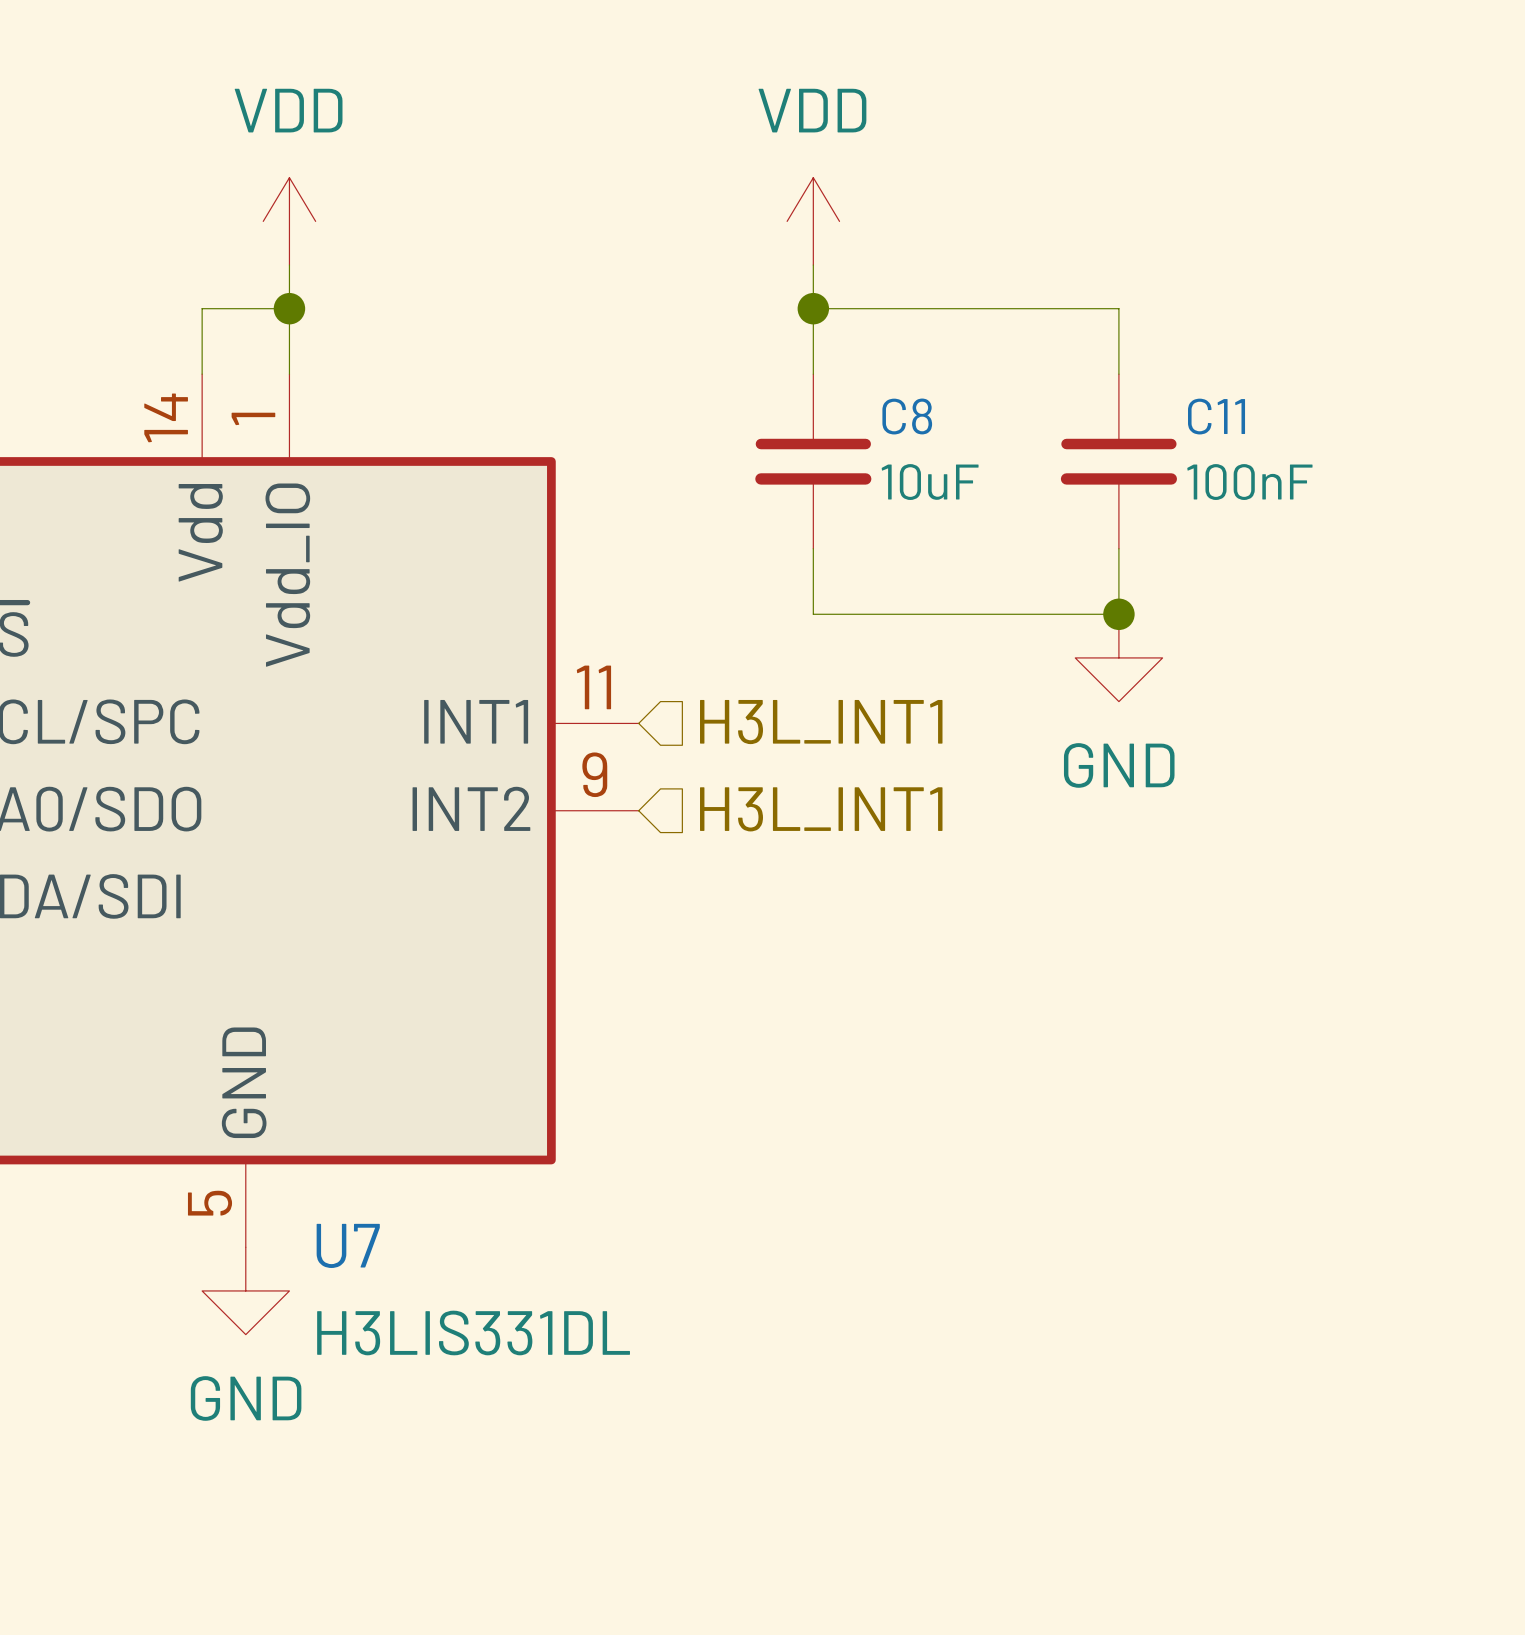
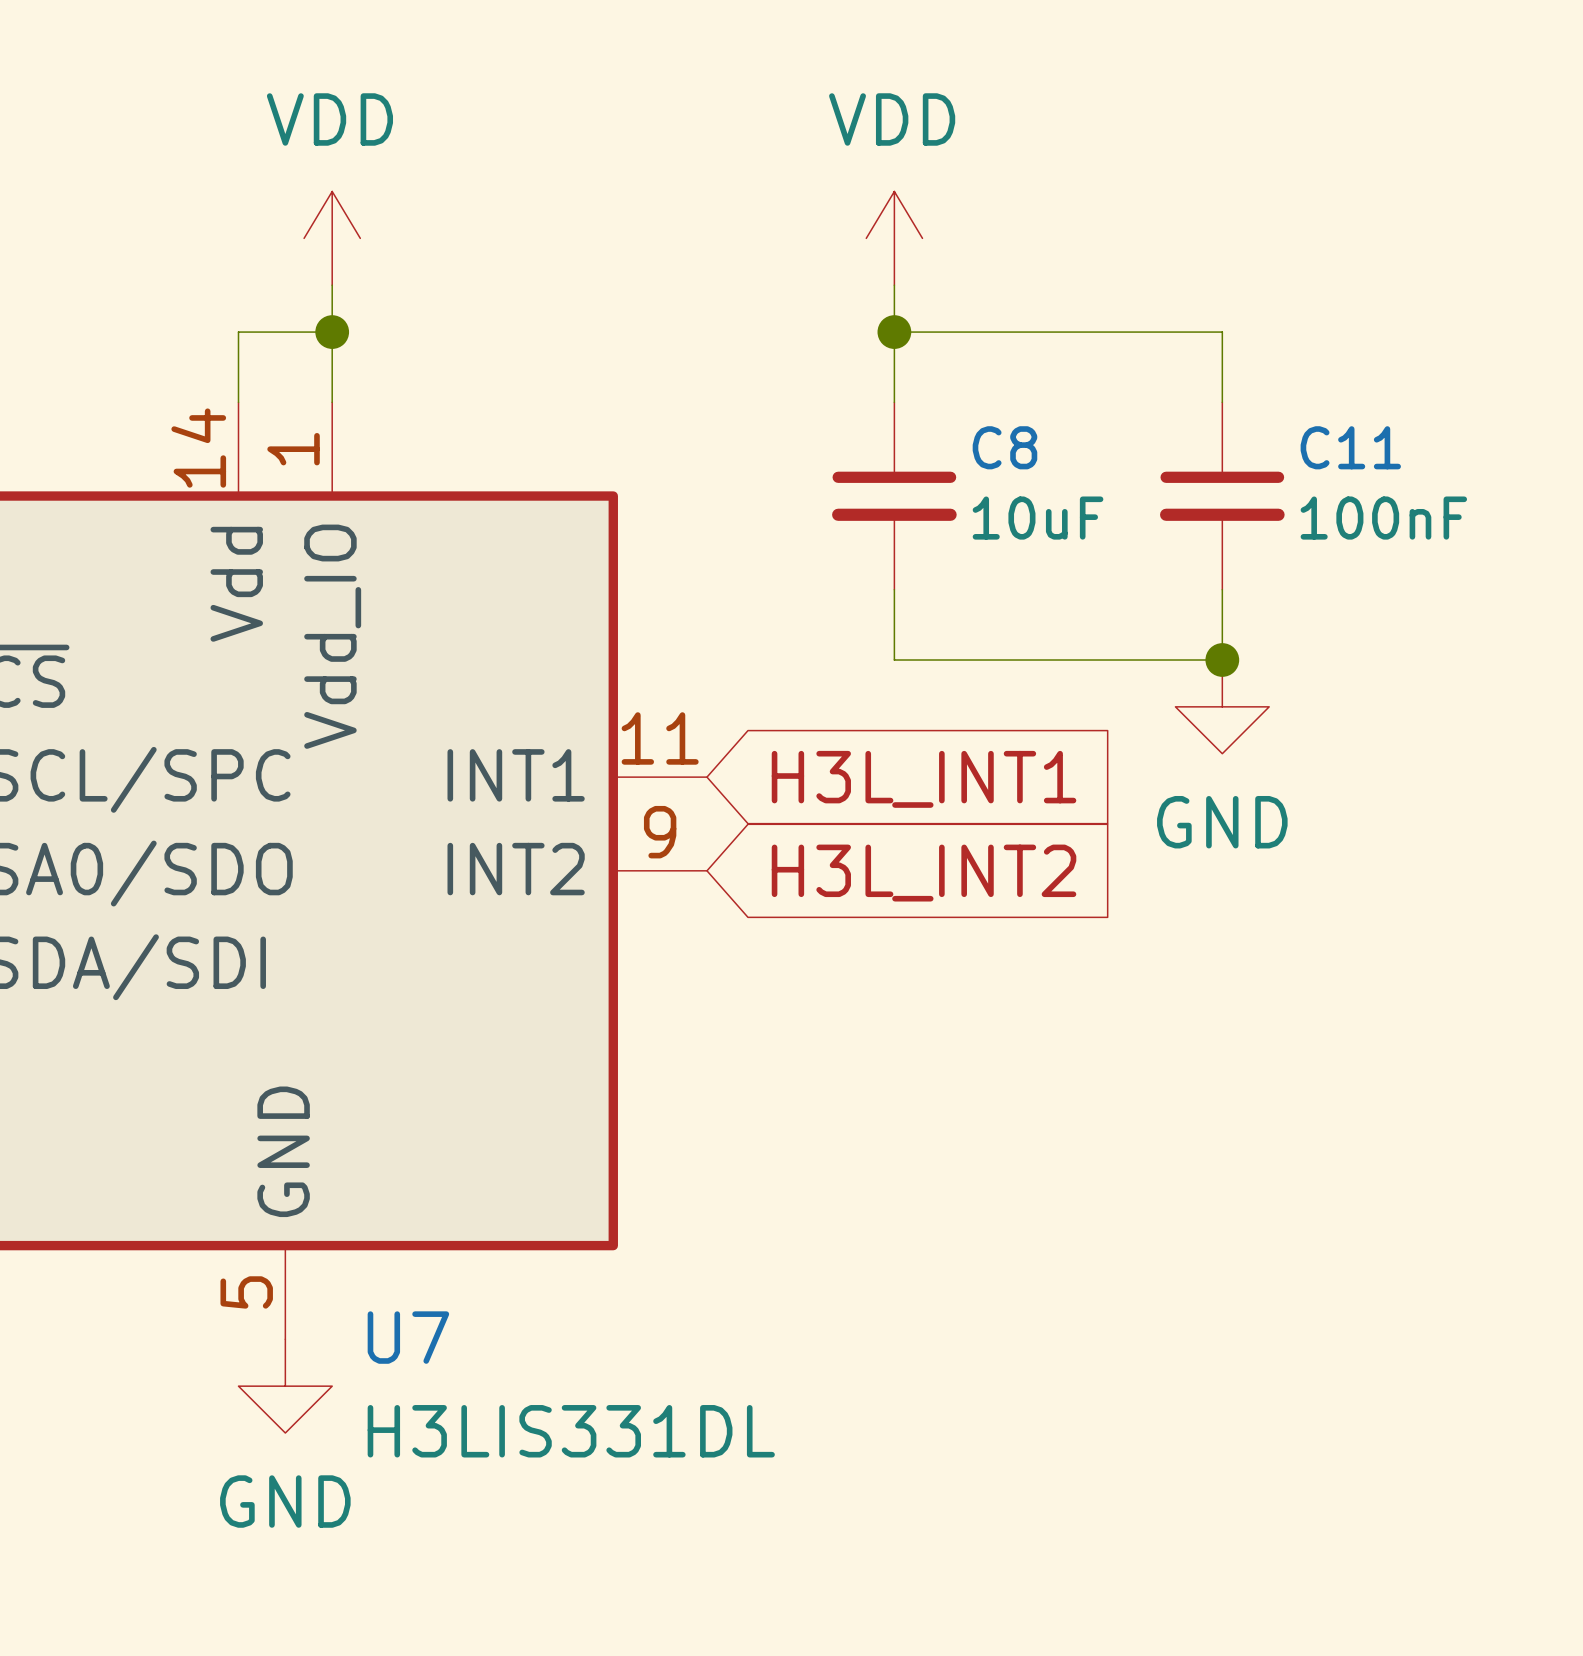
hierarchical label: H3L_INT1 (821, 722) -> none
global label: none -> H3L_INT1 (924, 779)
hierarchical label: H3L_INT1 (821, 809) -> none
global label: none -> H3L_INT2 (924, 873)

